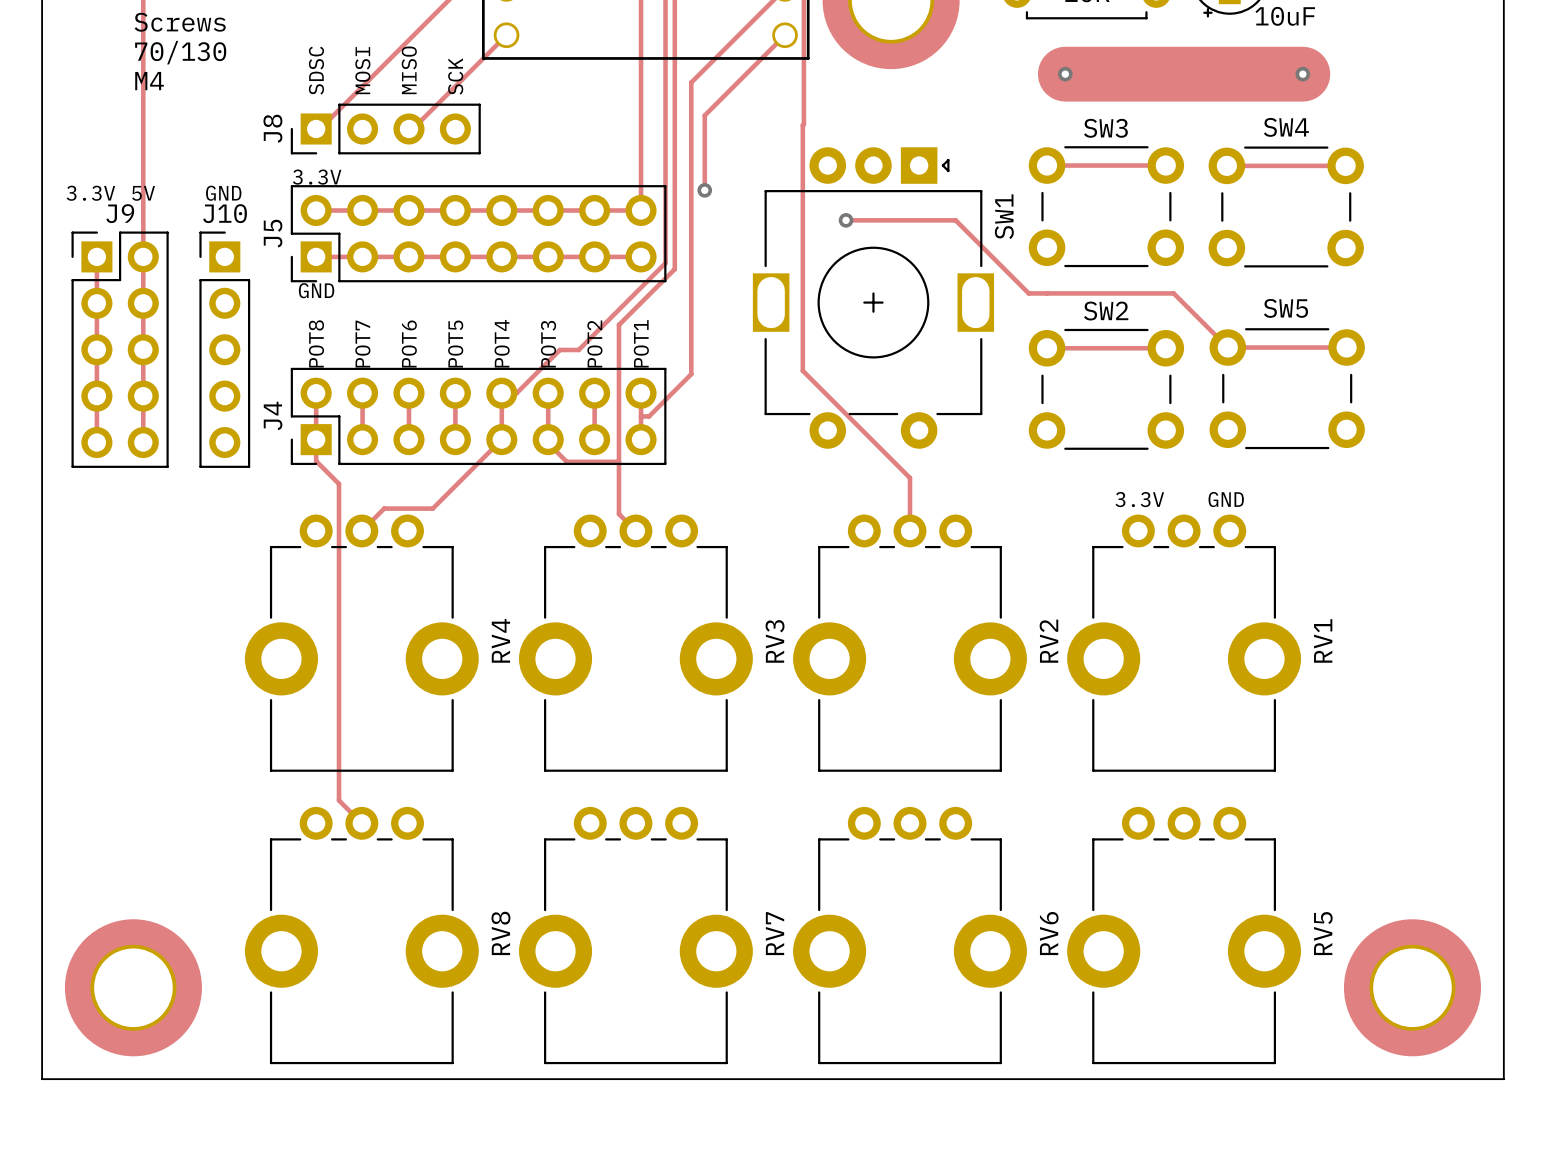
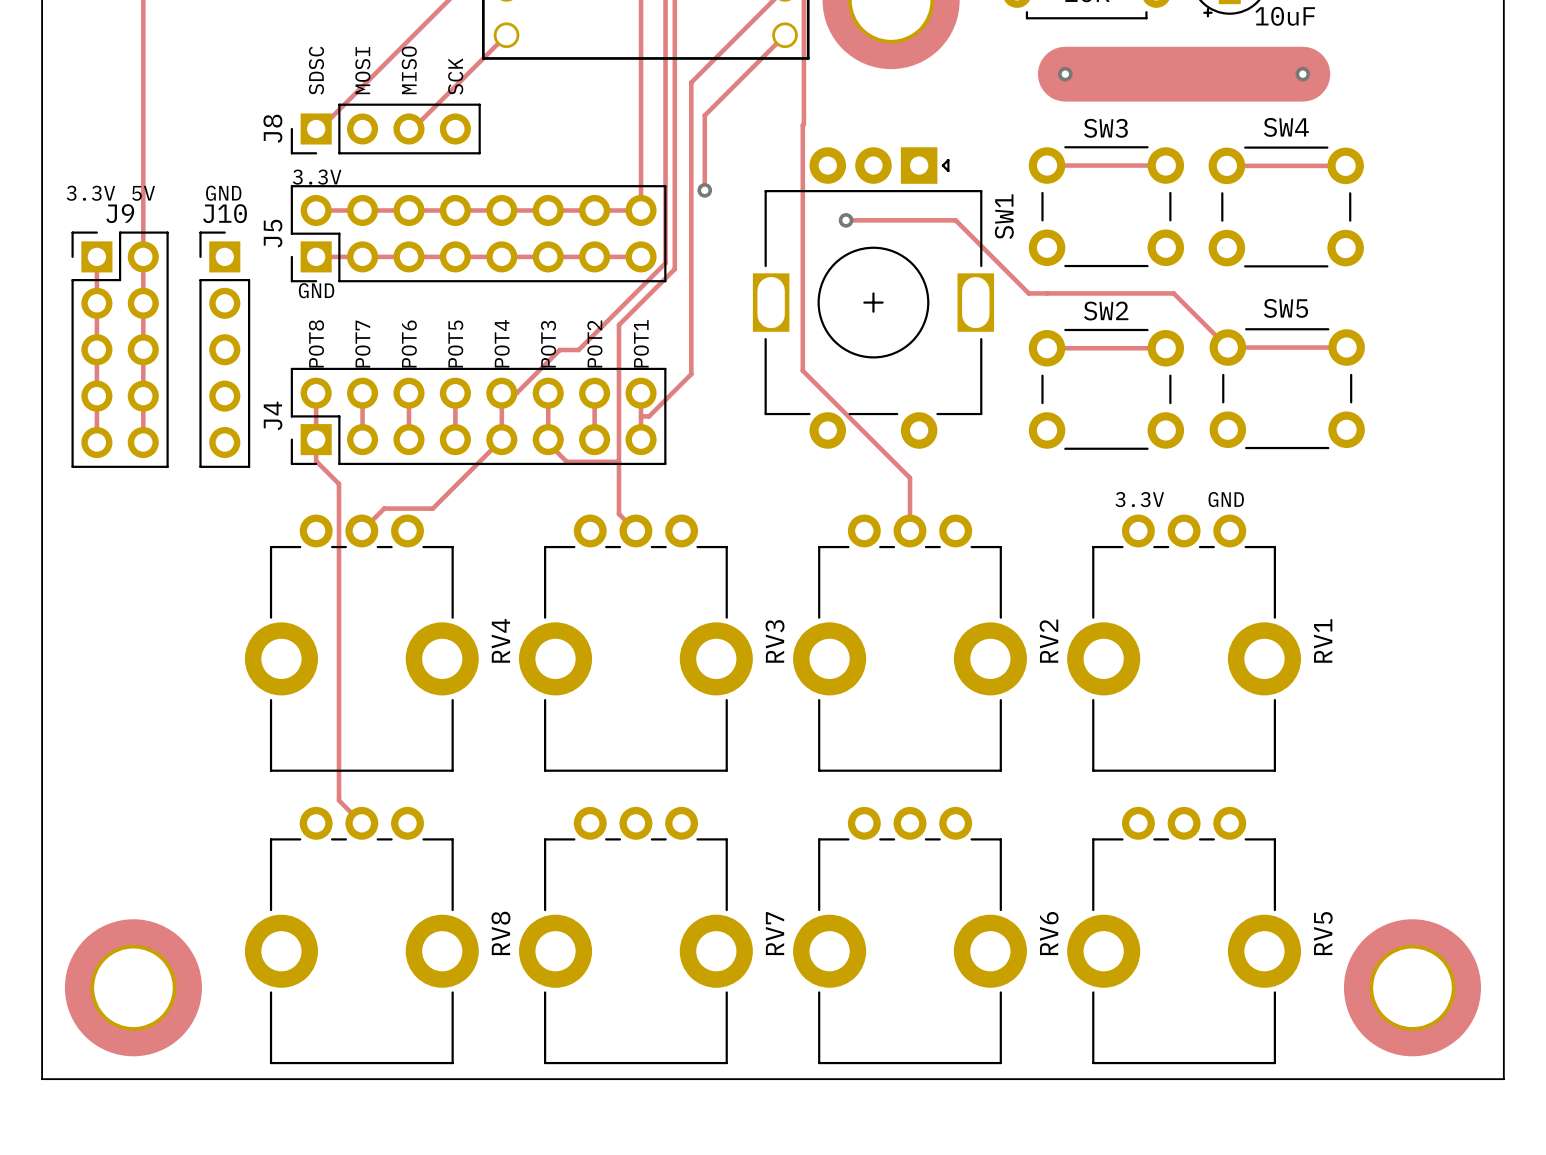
text: Screws (180, 22) -> none
text: 70/130 (180, 52) -> none
text: M4 (149, 81) -> none

